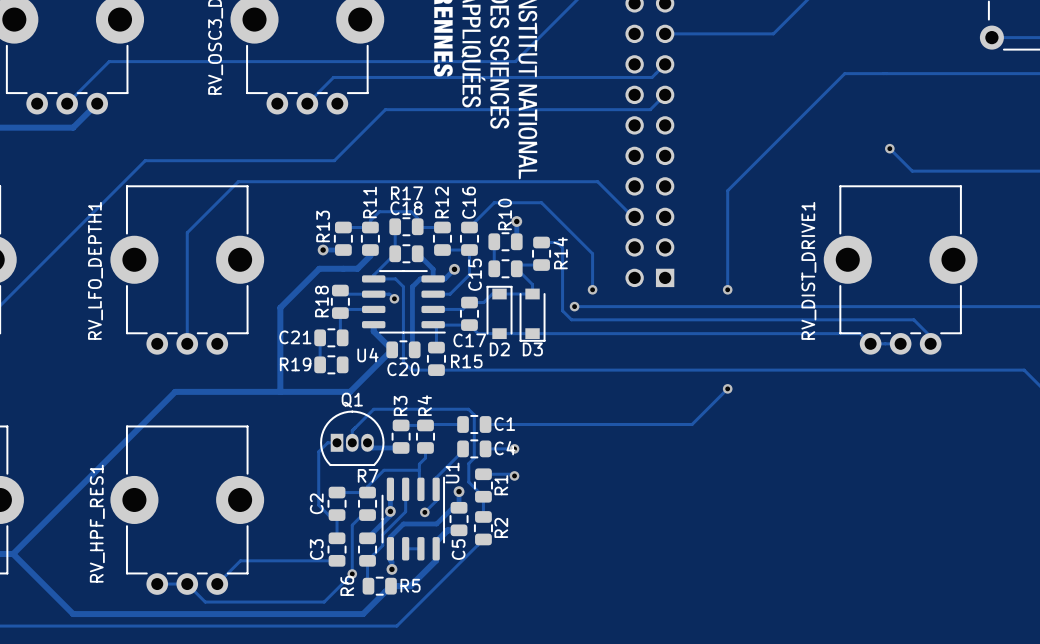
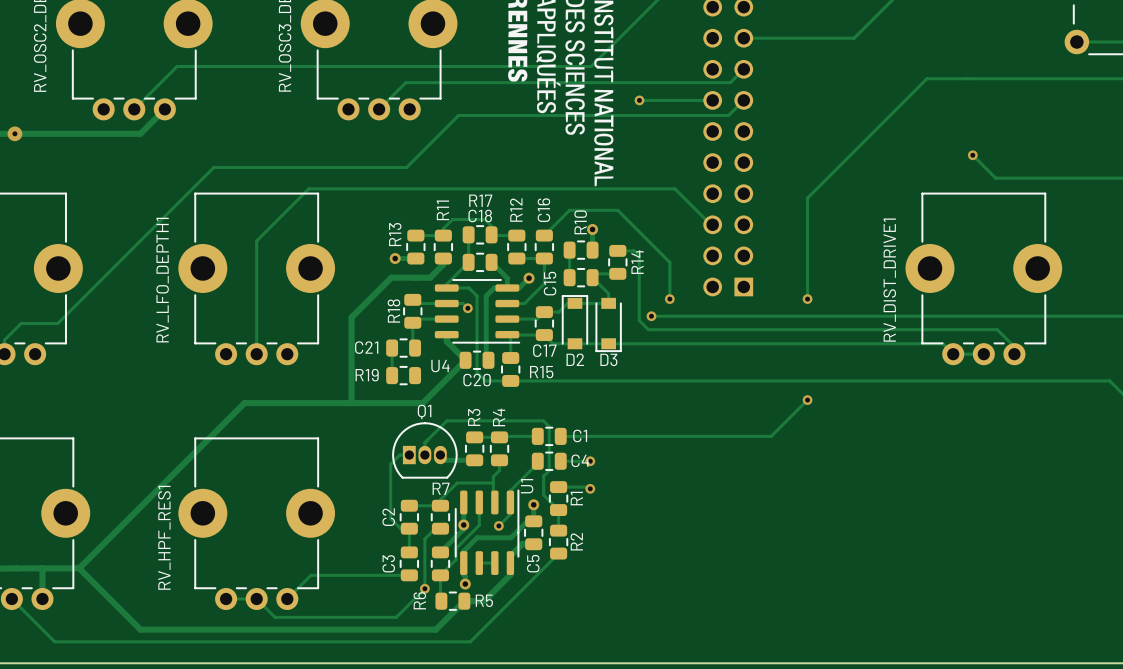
track: none -> (639, 100) (712, 100)
via: none -> (639, 100)

